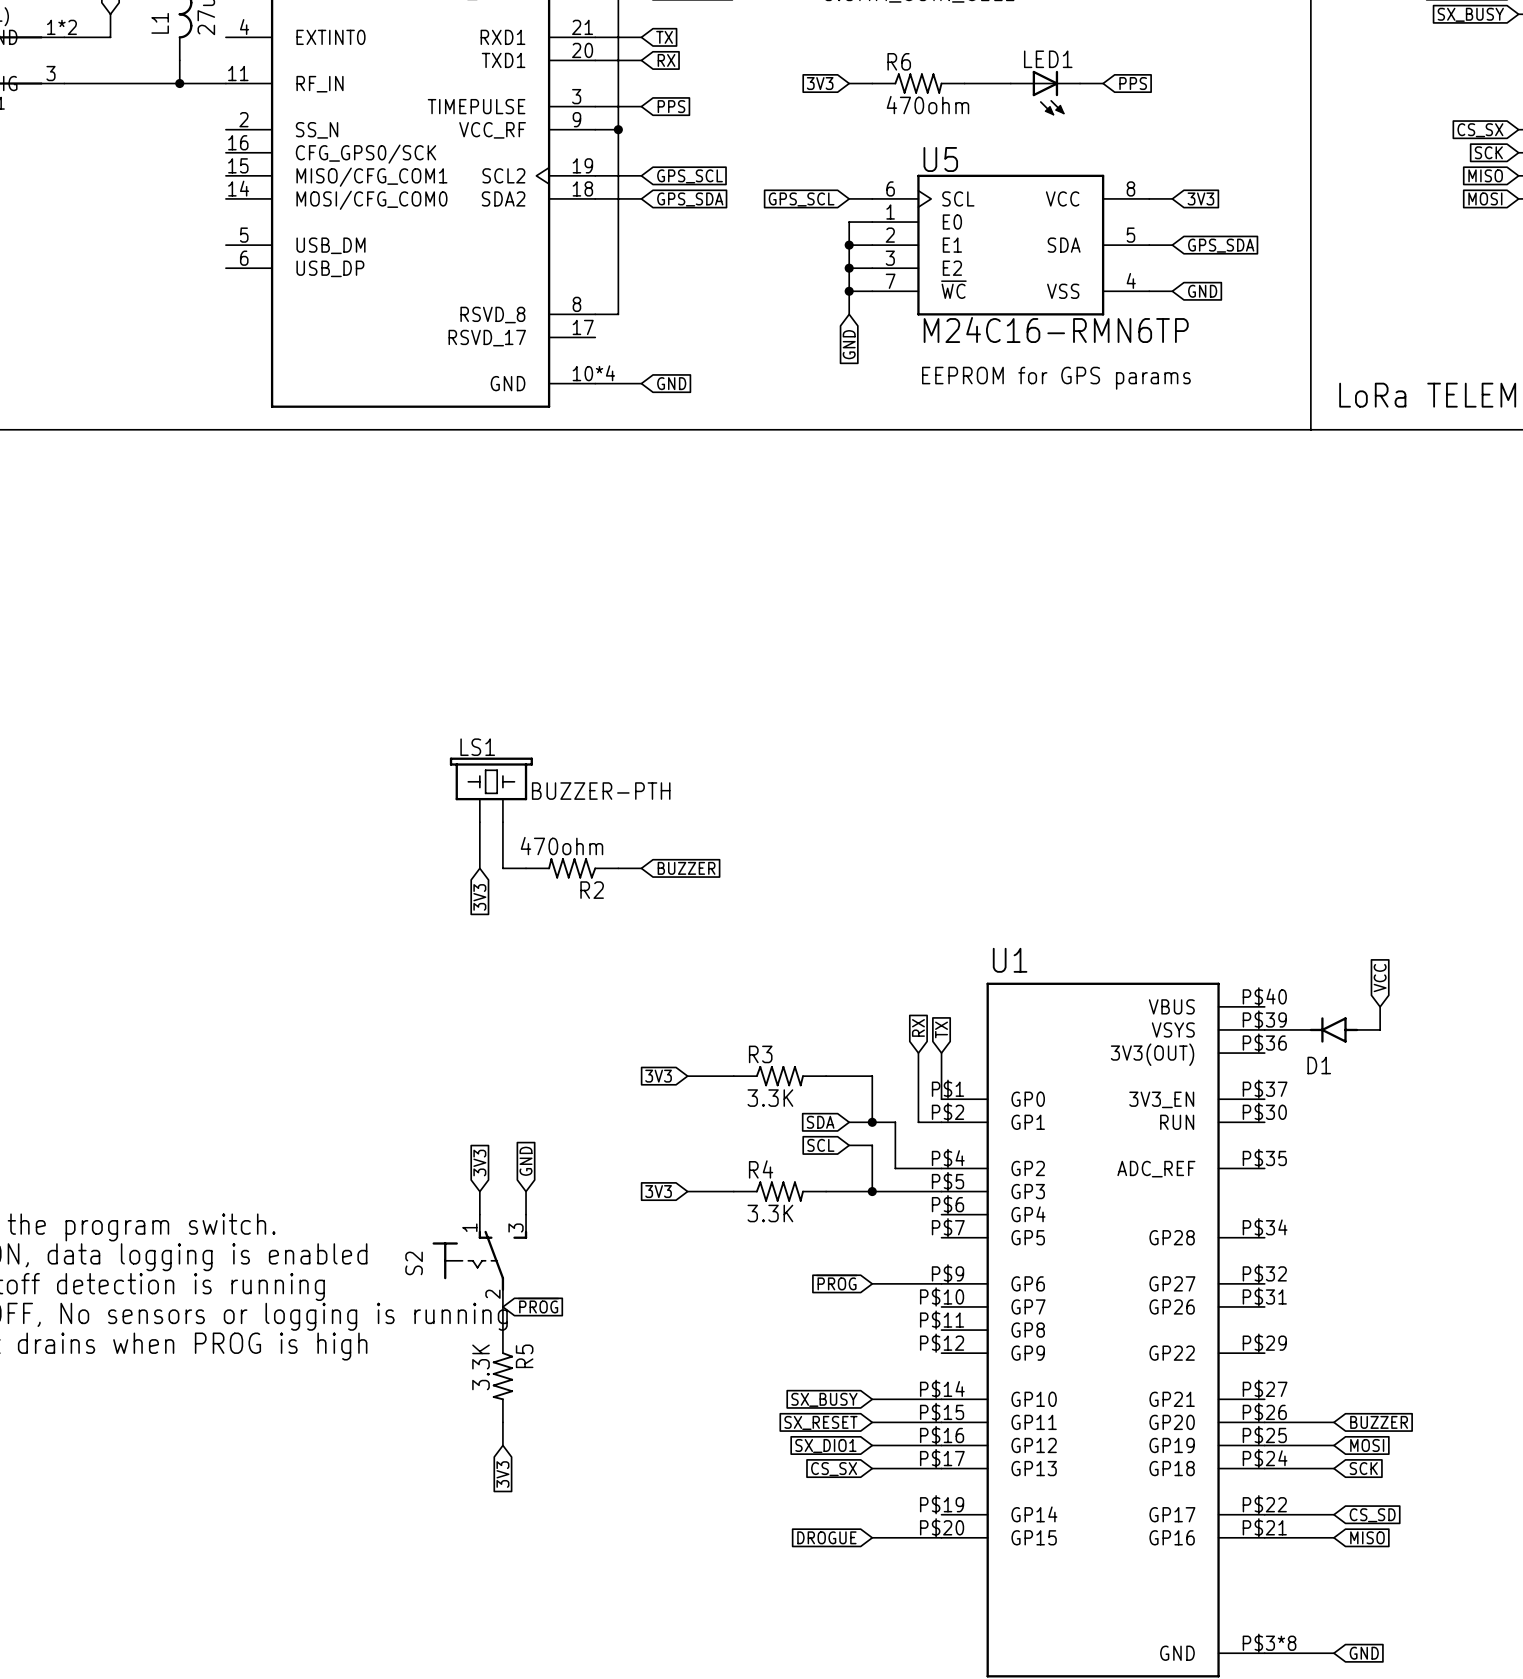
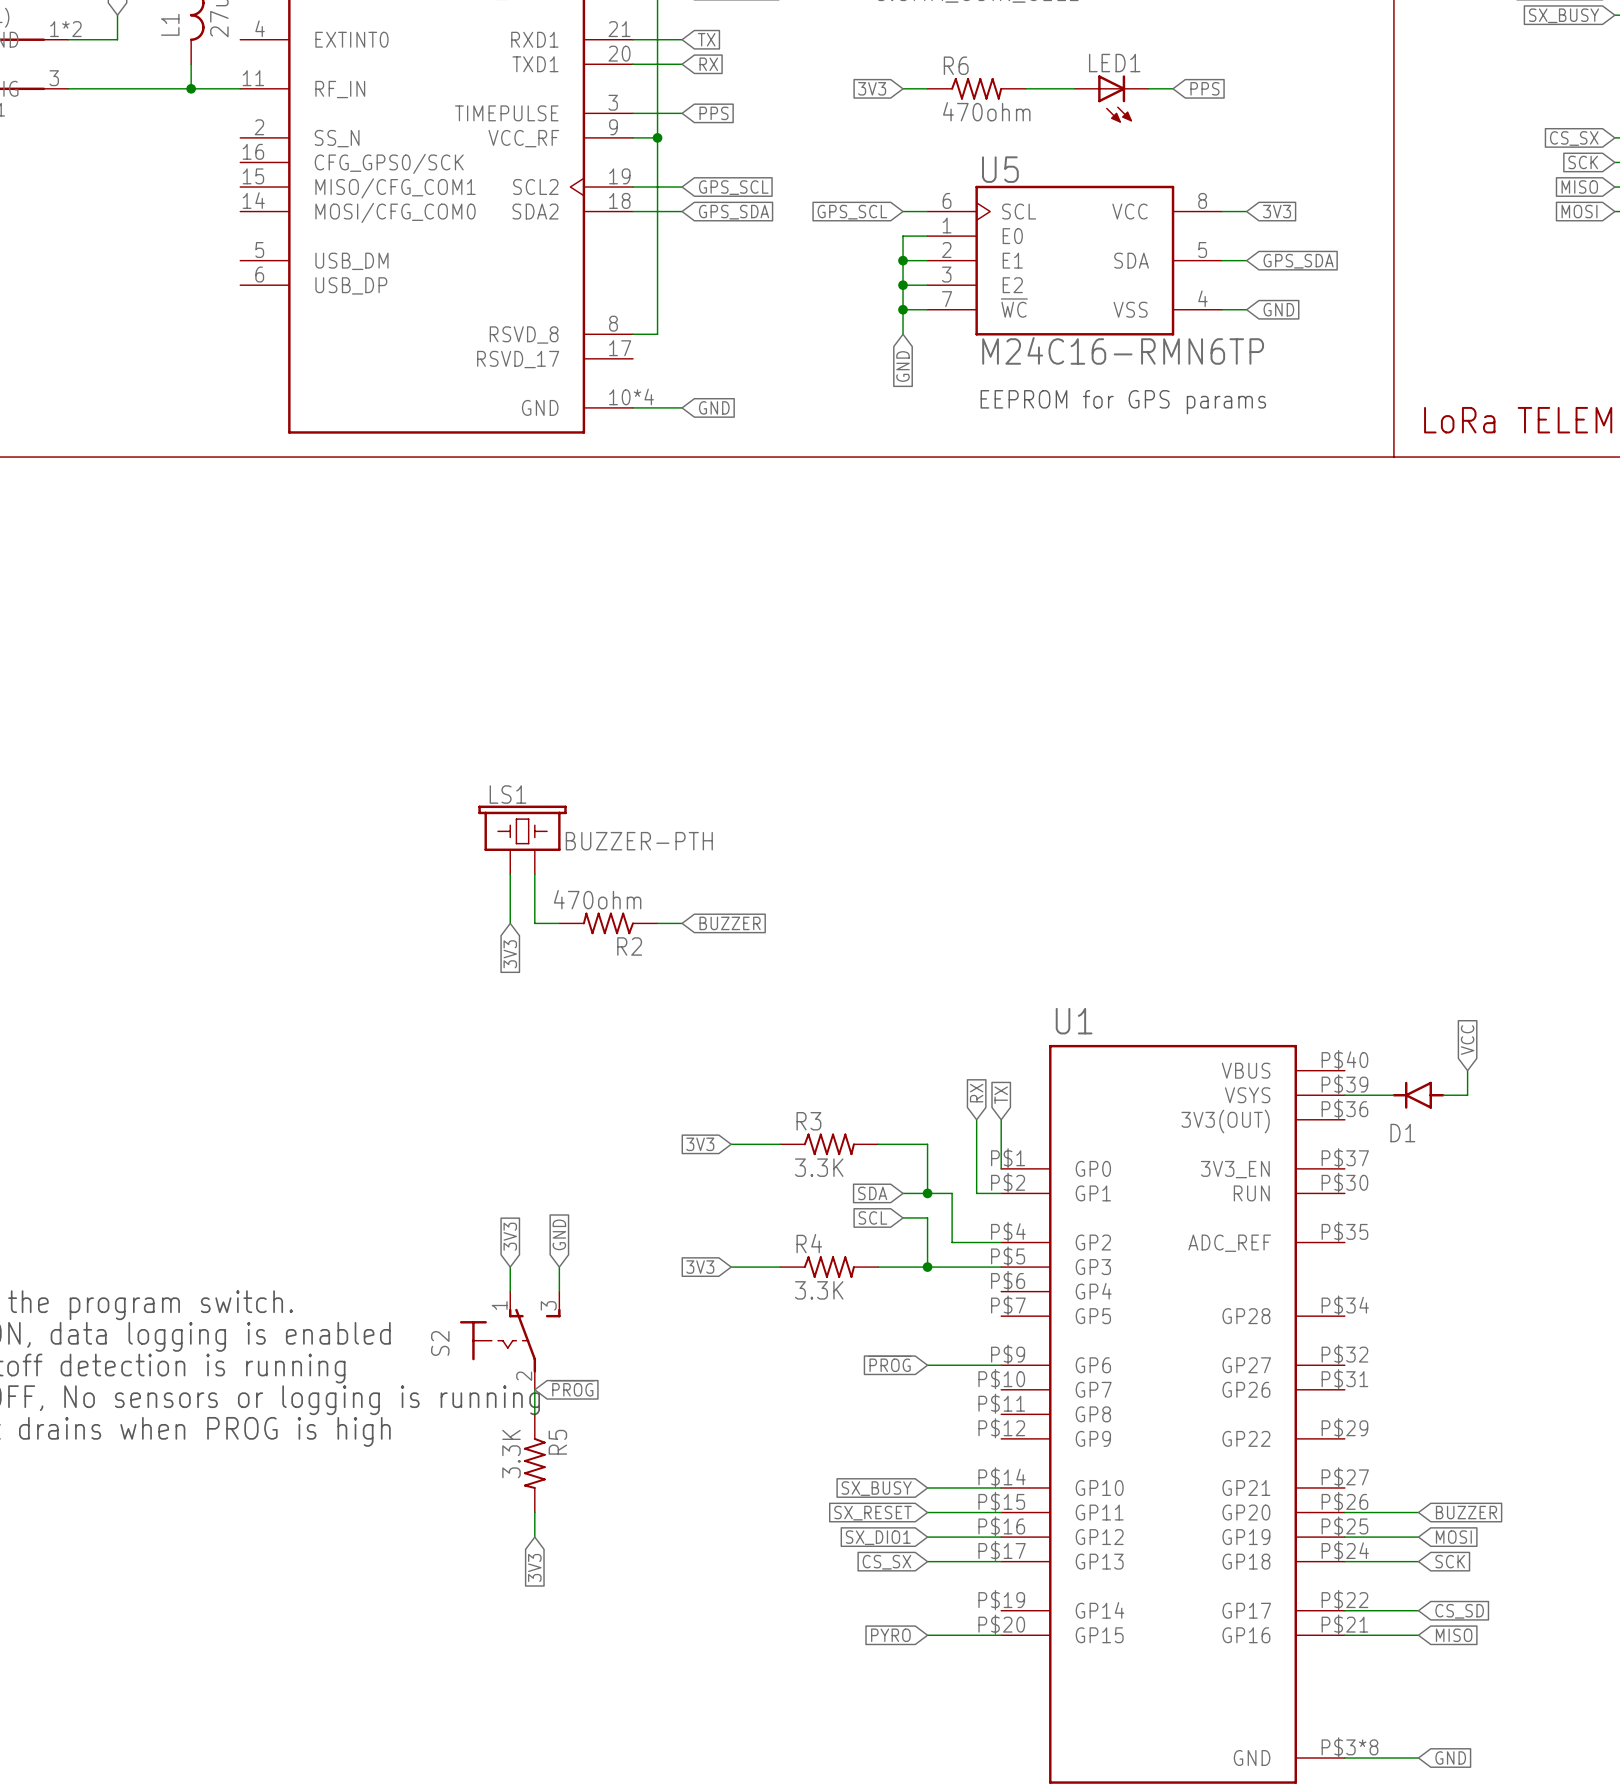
global label: DROGUE (826, 1537) -> PYRO (890, 1635)

